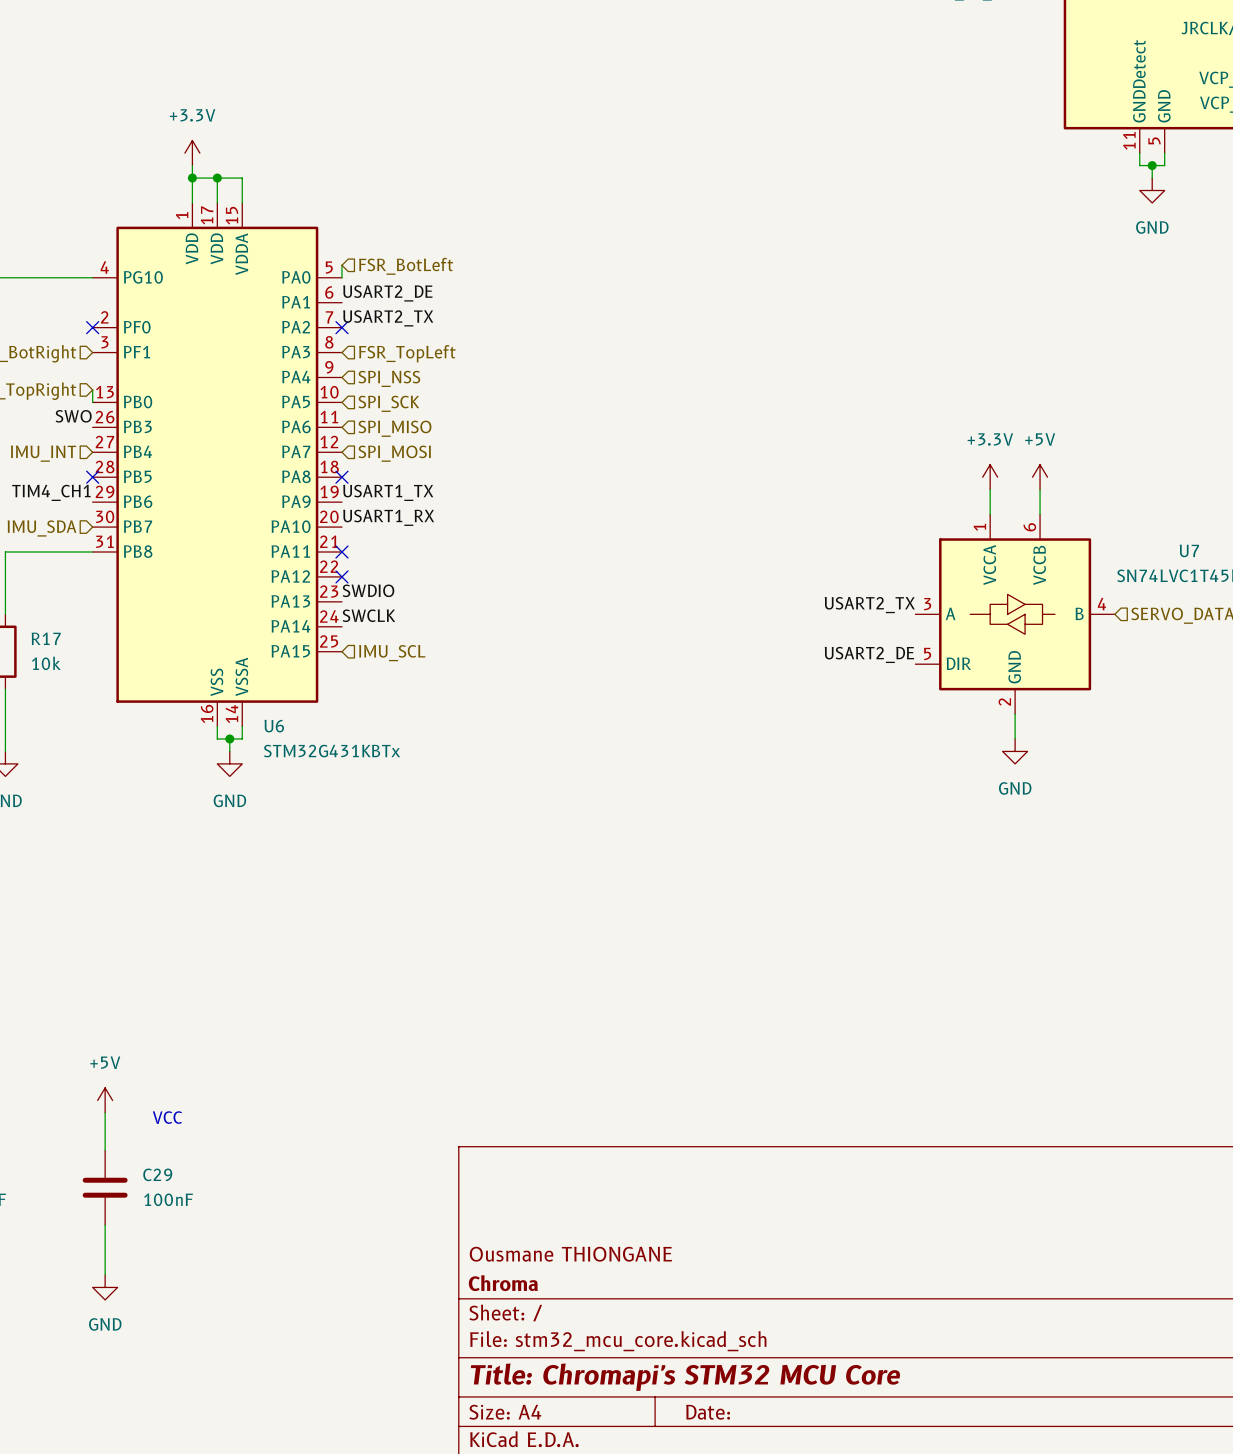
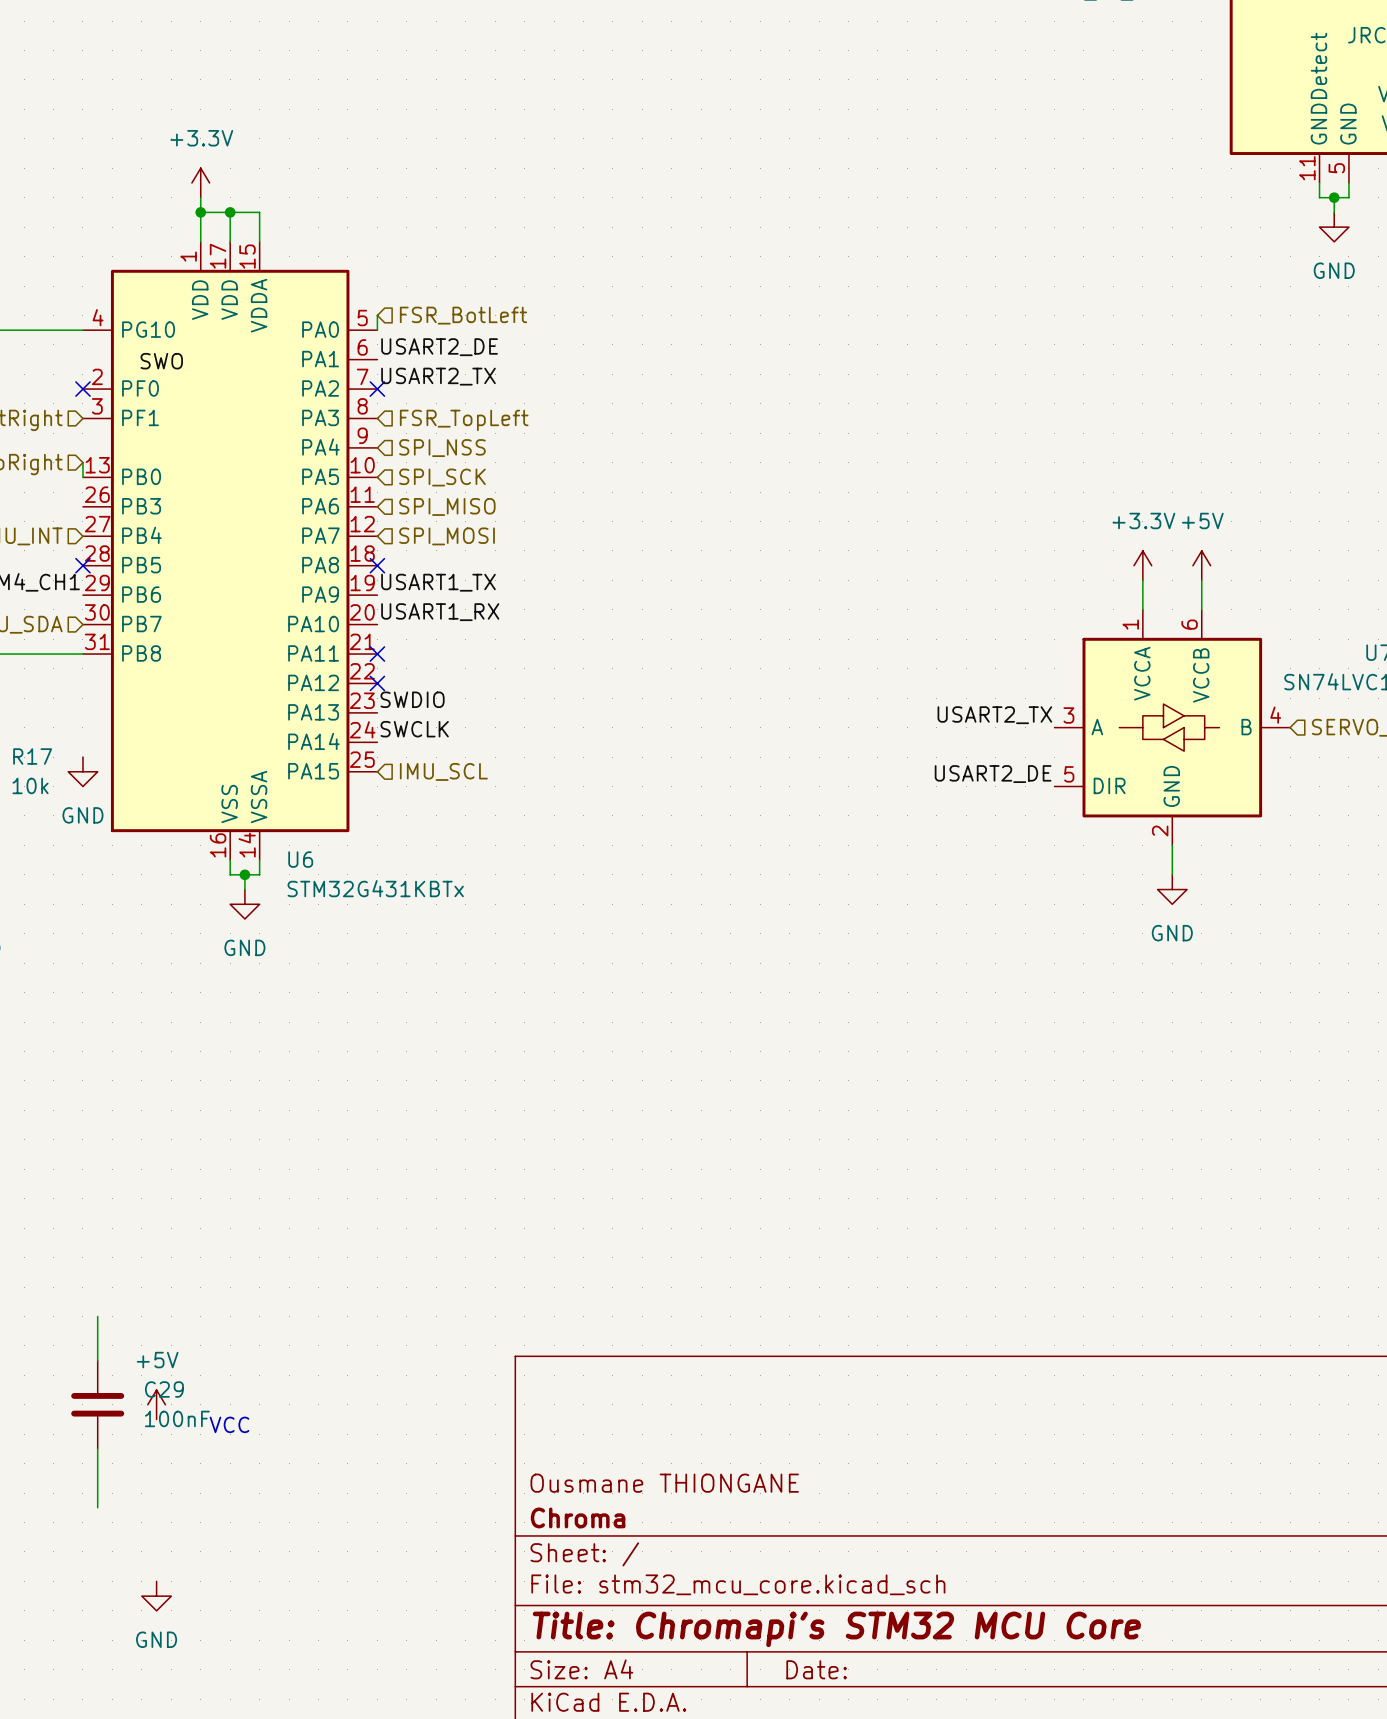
label position: SWO (73, 416) -> SWO (161, 361)
power symbol: none -> GND (82, 771)
power symbol position: +5V (105, 1100) -> +5V (156, 1404)
text position: VCC (167, 1117) -> VCC (229, 1424)
power symbol position: GND (105, 1287) -> GND (156, 1596)

